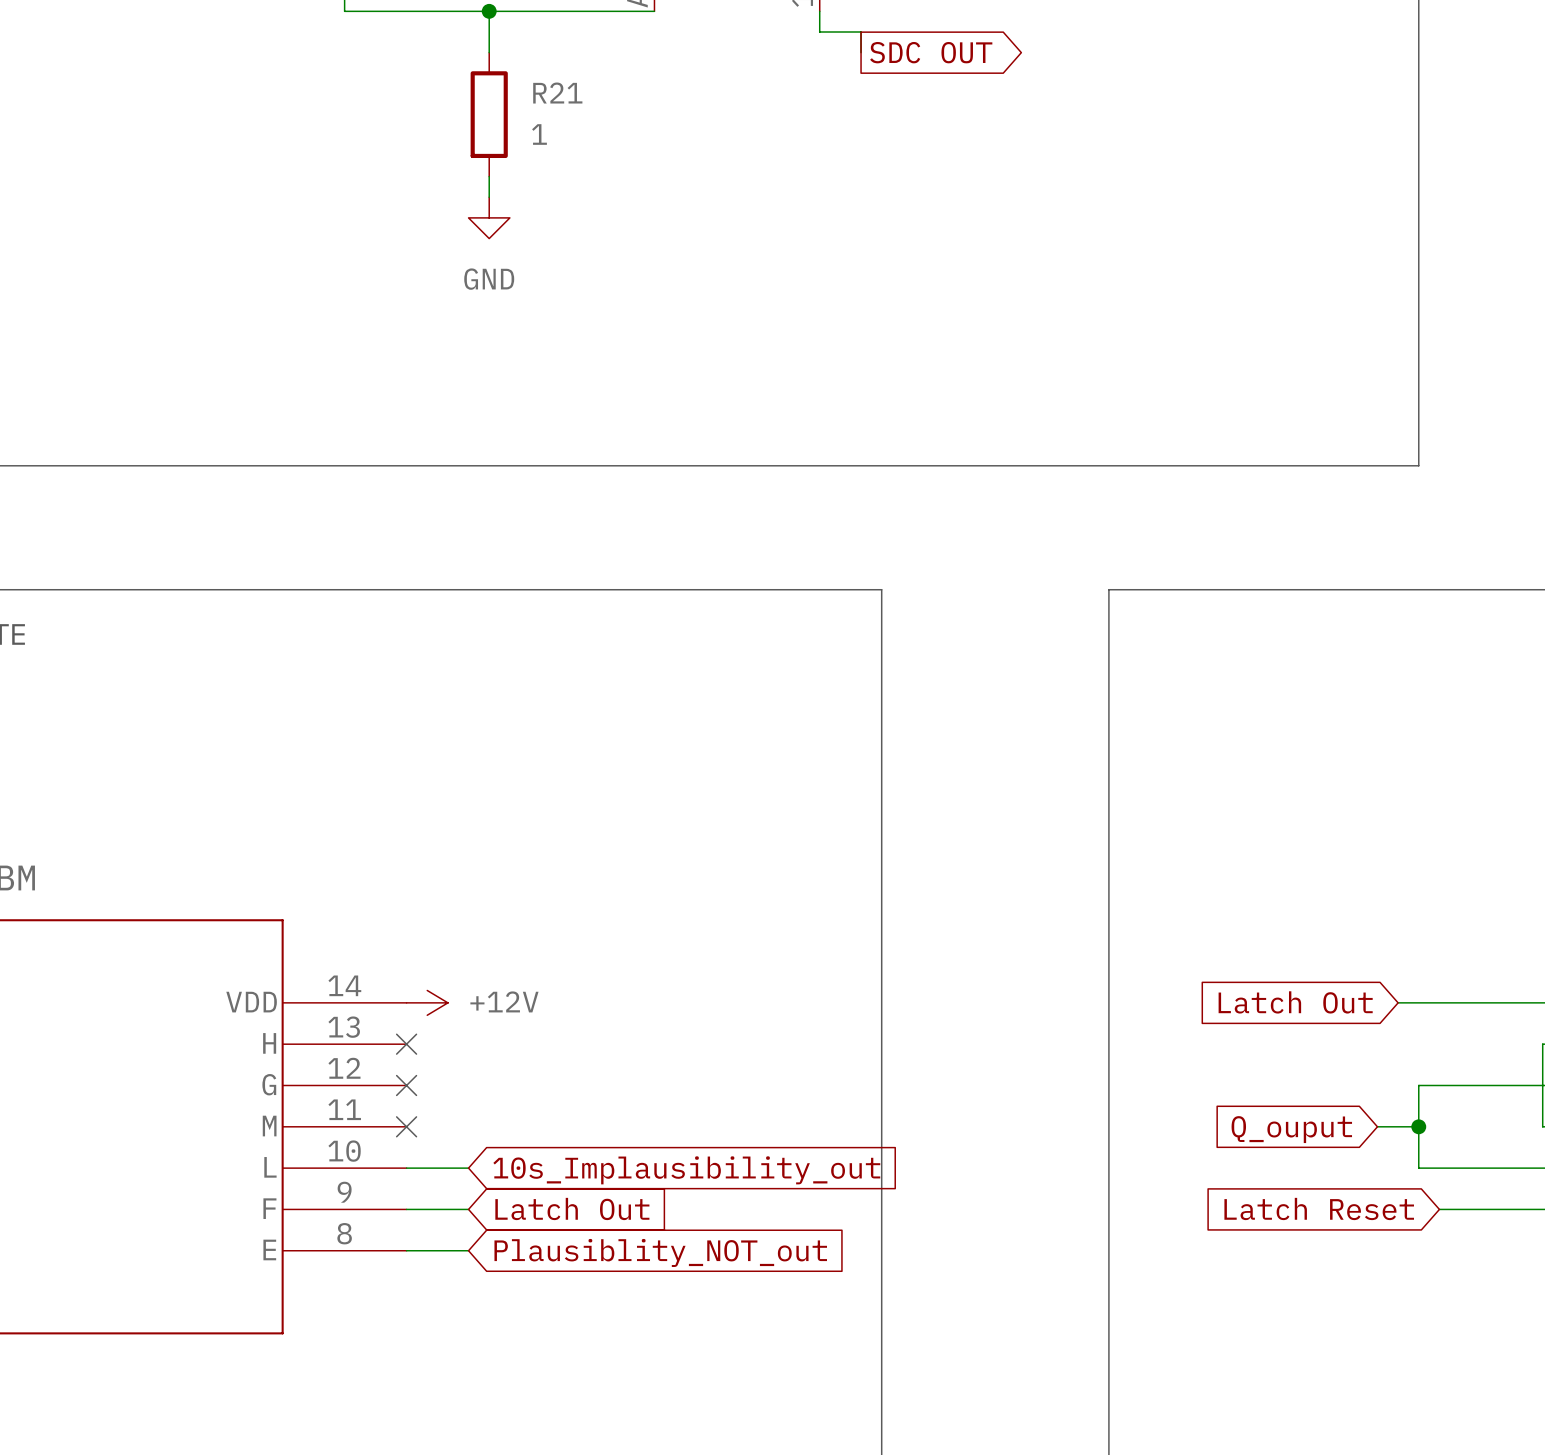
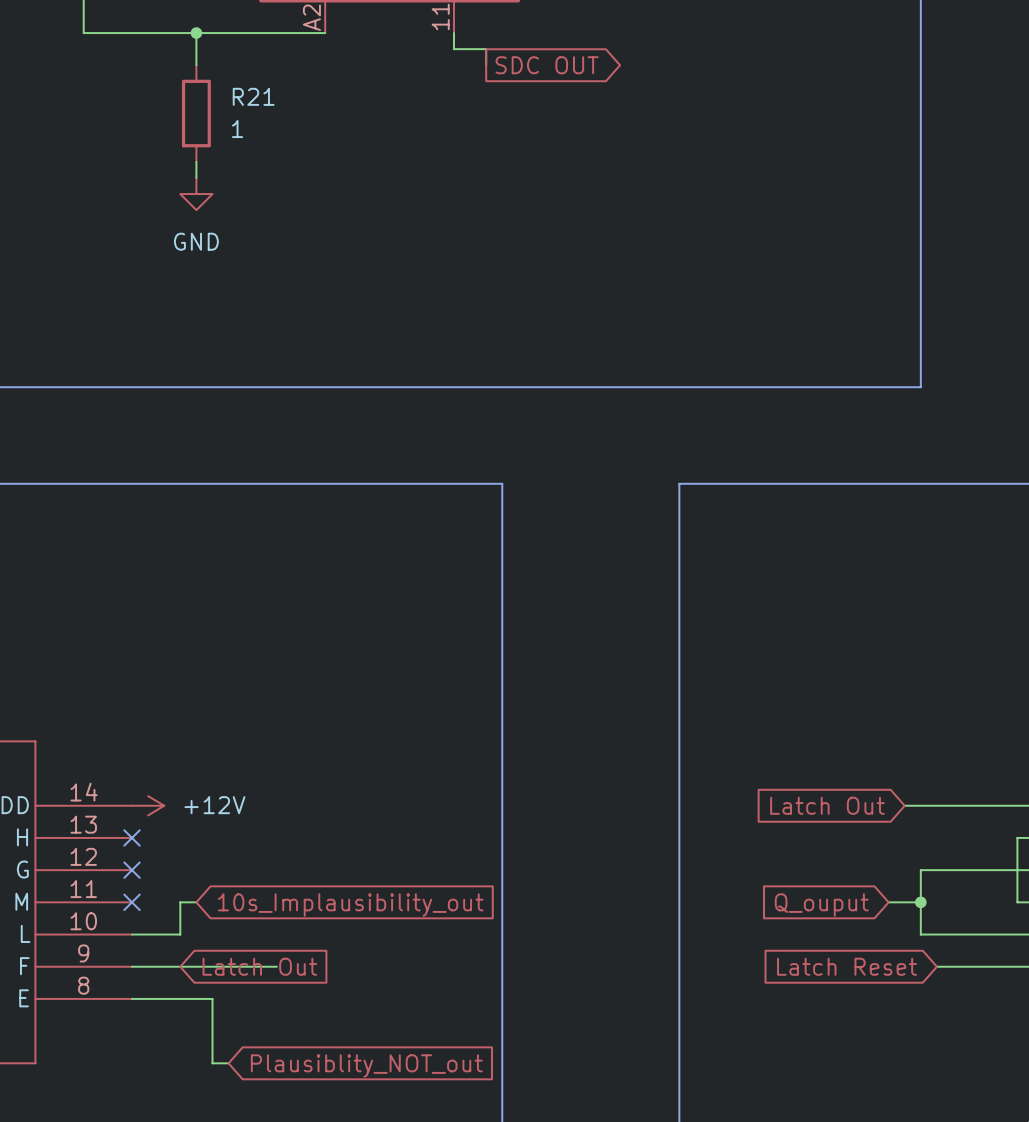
wire: none -> (196, 902) (180, 902) (180, 934)
global label position: 10s_Implausibility_out (686, 1170) -> 10s_Implausibility_out (350, 905)
wire: none -> (180, 966) (276, 966)
wire: none -> (180, 998) (212, 998) (212, 1063) (228, 1063)
global label position: Plausiblity_NOT_out (660, 1252) -> Plausiblity_NOT_out (366, 1066)

